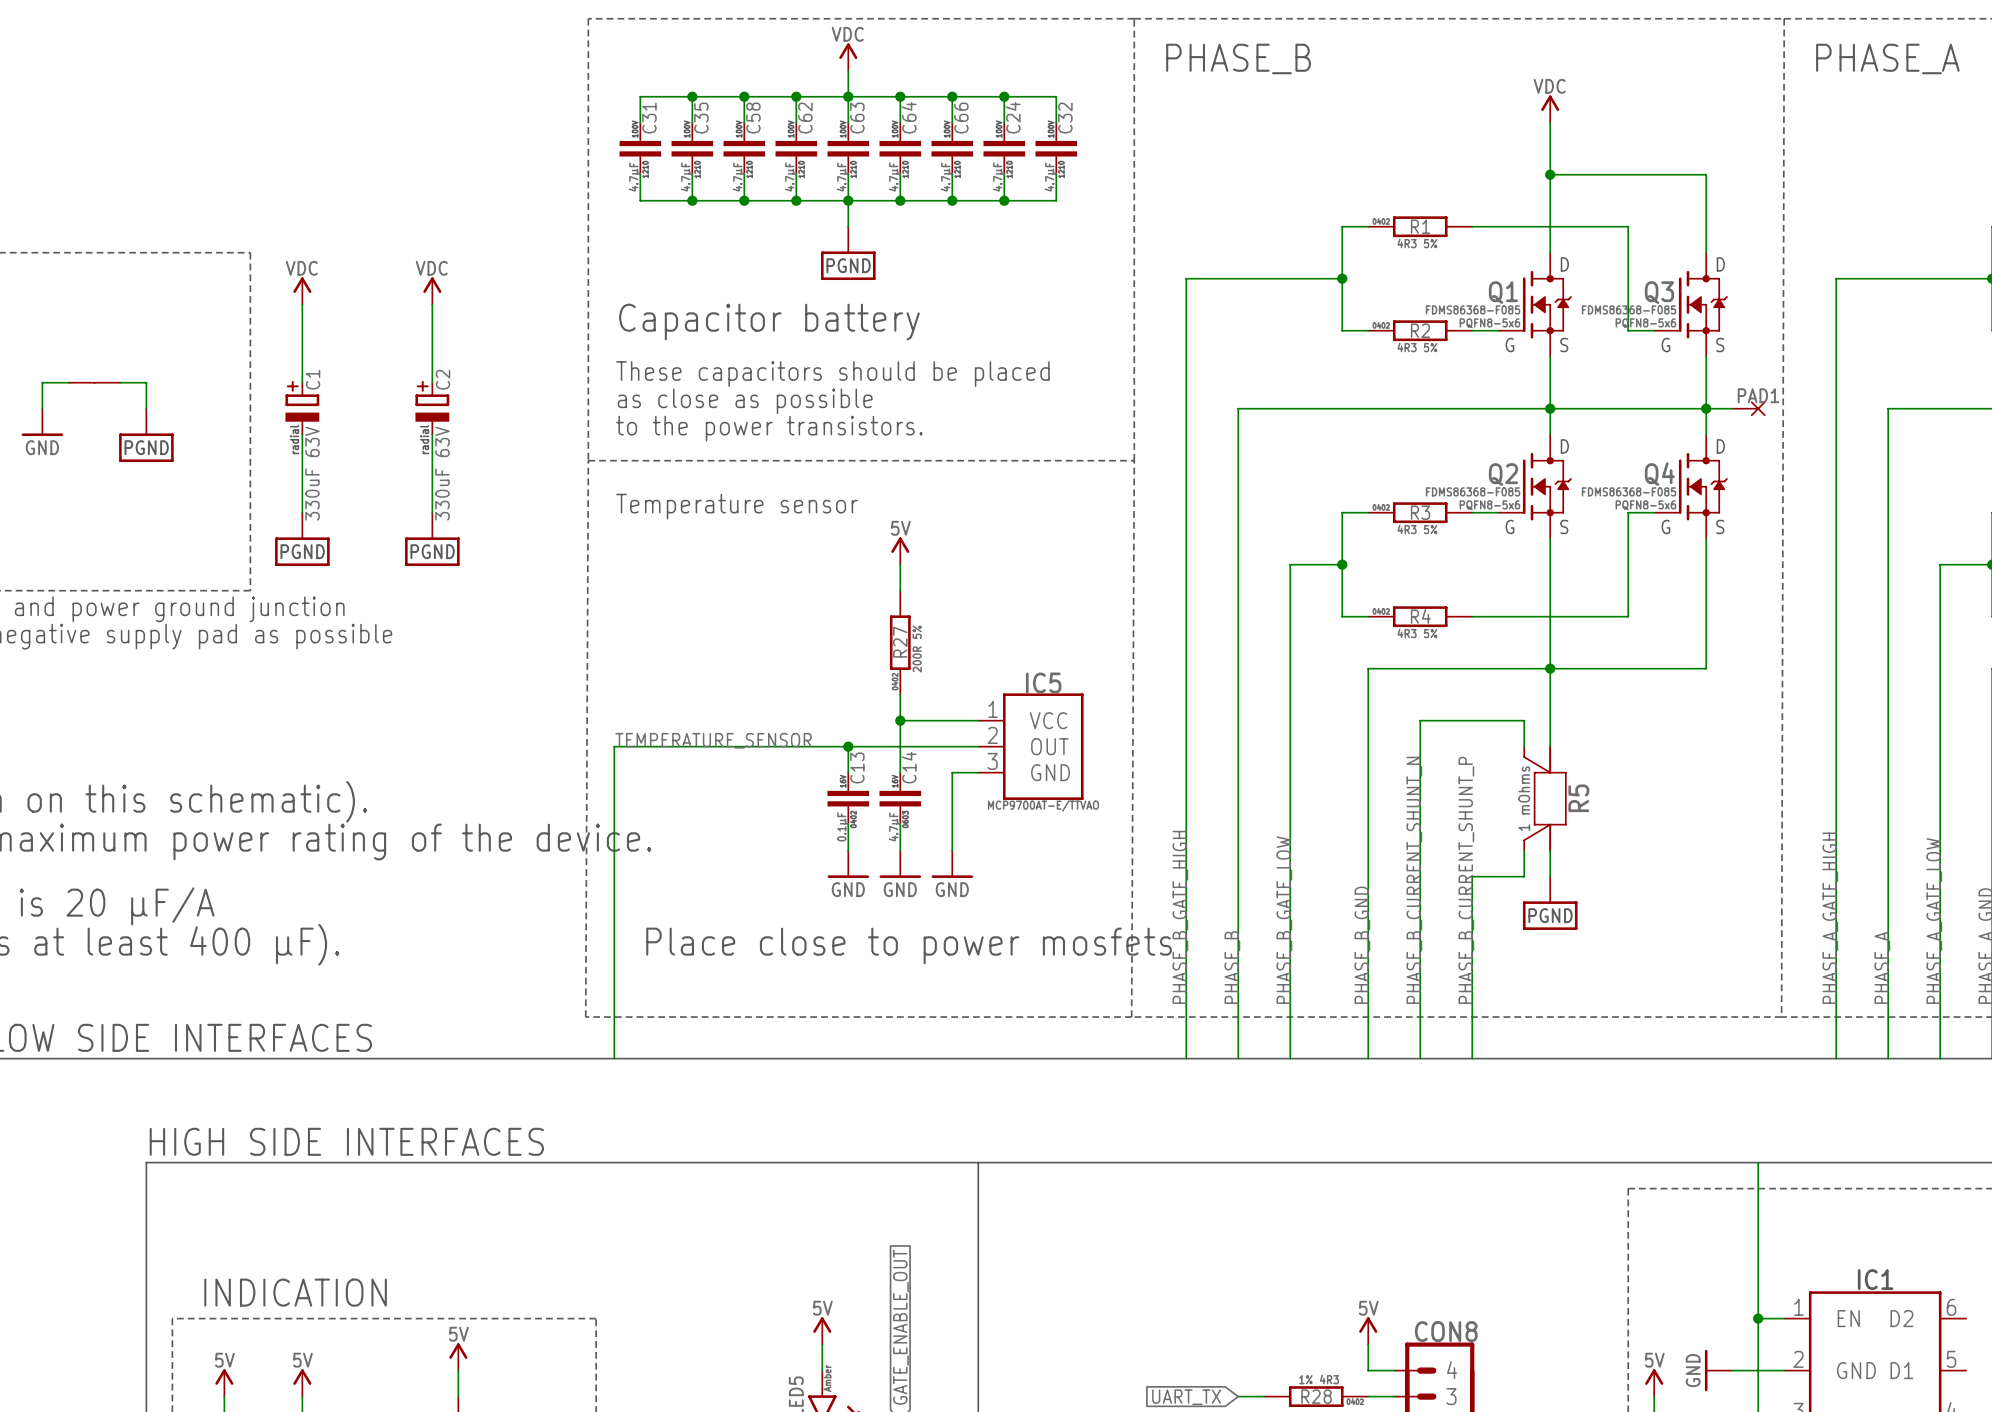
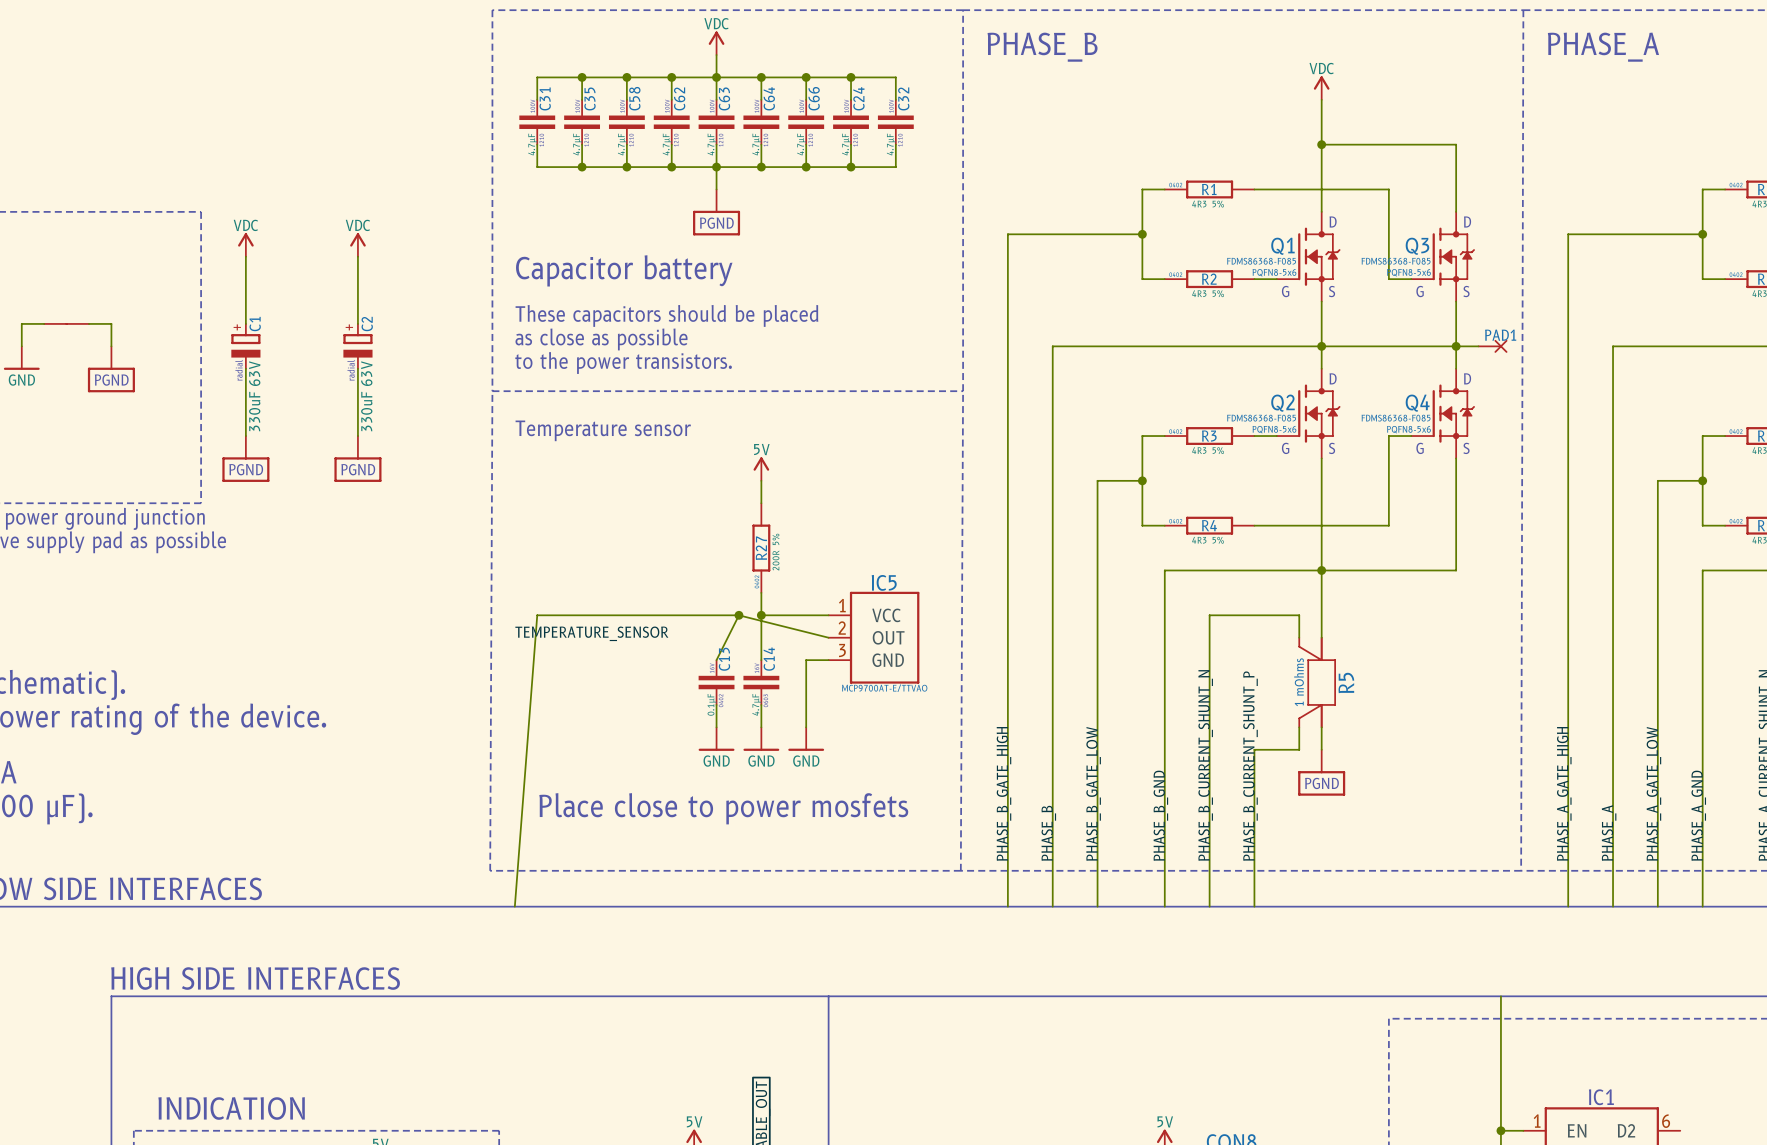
wire: none -> (738, 615) (828, 637)
wire: (848, 746) (848, 772) -> (738, 615) (716, 660)
junction position: (848, 746) -> (738, 615)
wire: (978, 746) (614, 746) (614, 1058) -> (738, 615) (537, 615) (514, 906)

